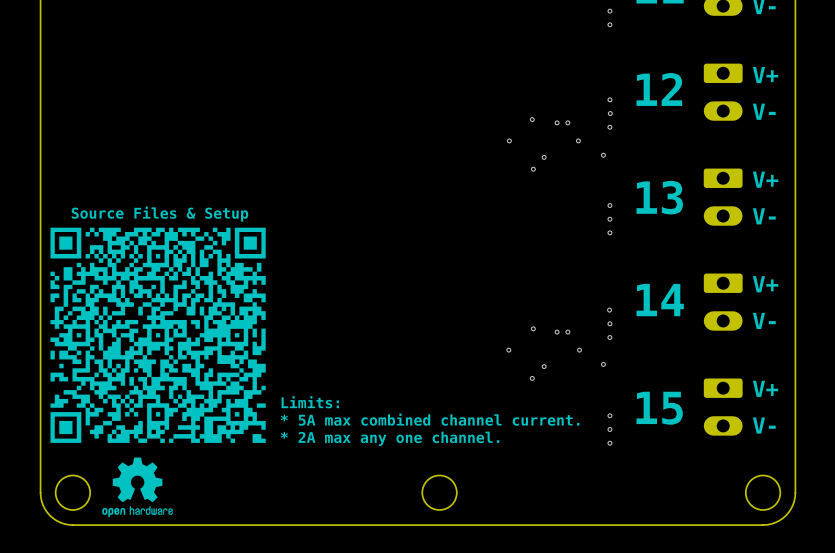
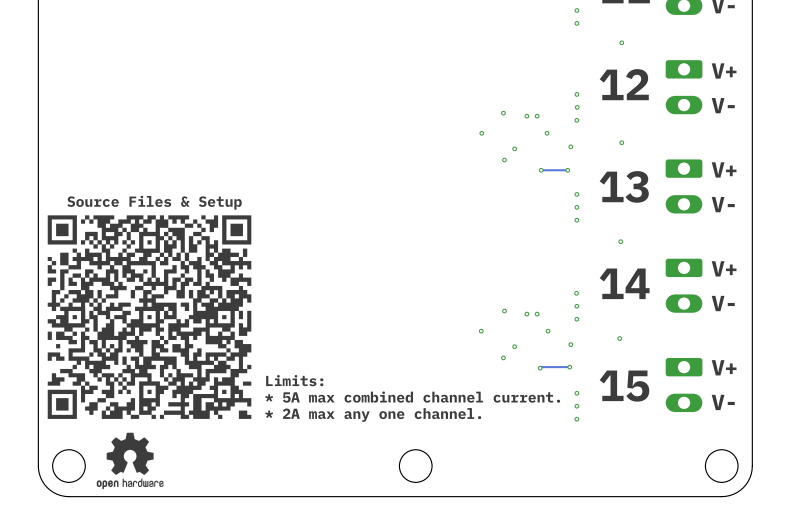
via: none -> (621, 42)
via: none -> (621, 142)
via: none -> (541, 170)
track: none -> (567, 170) (541, 170)
via: none -> (567, 170)
via: none -> (620, 241)
via: none -> (619, 338)
track: none -> (569, 367) (540, 368)
via: none -> (569, 367)
via: none -> (540, 368)

